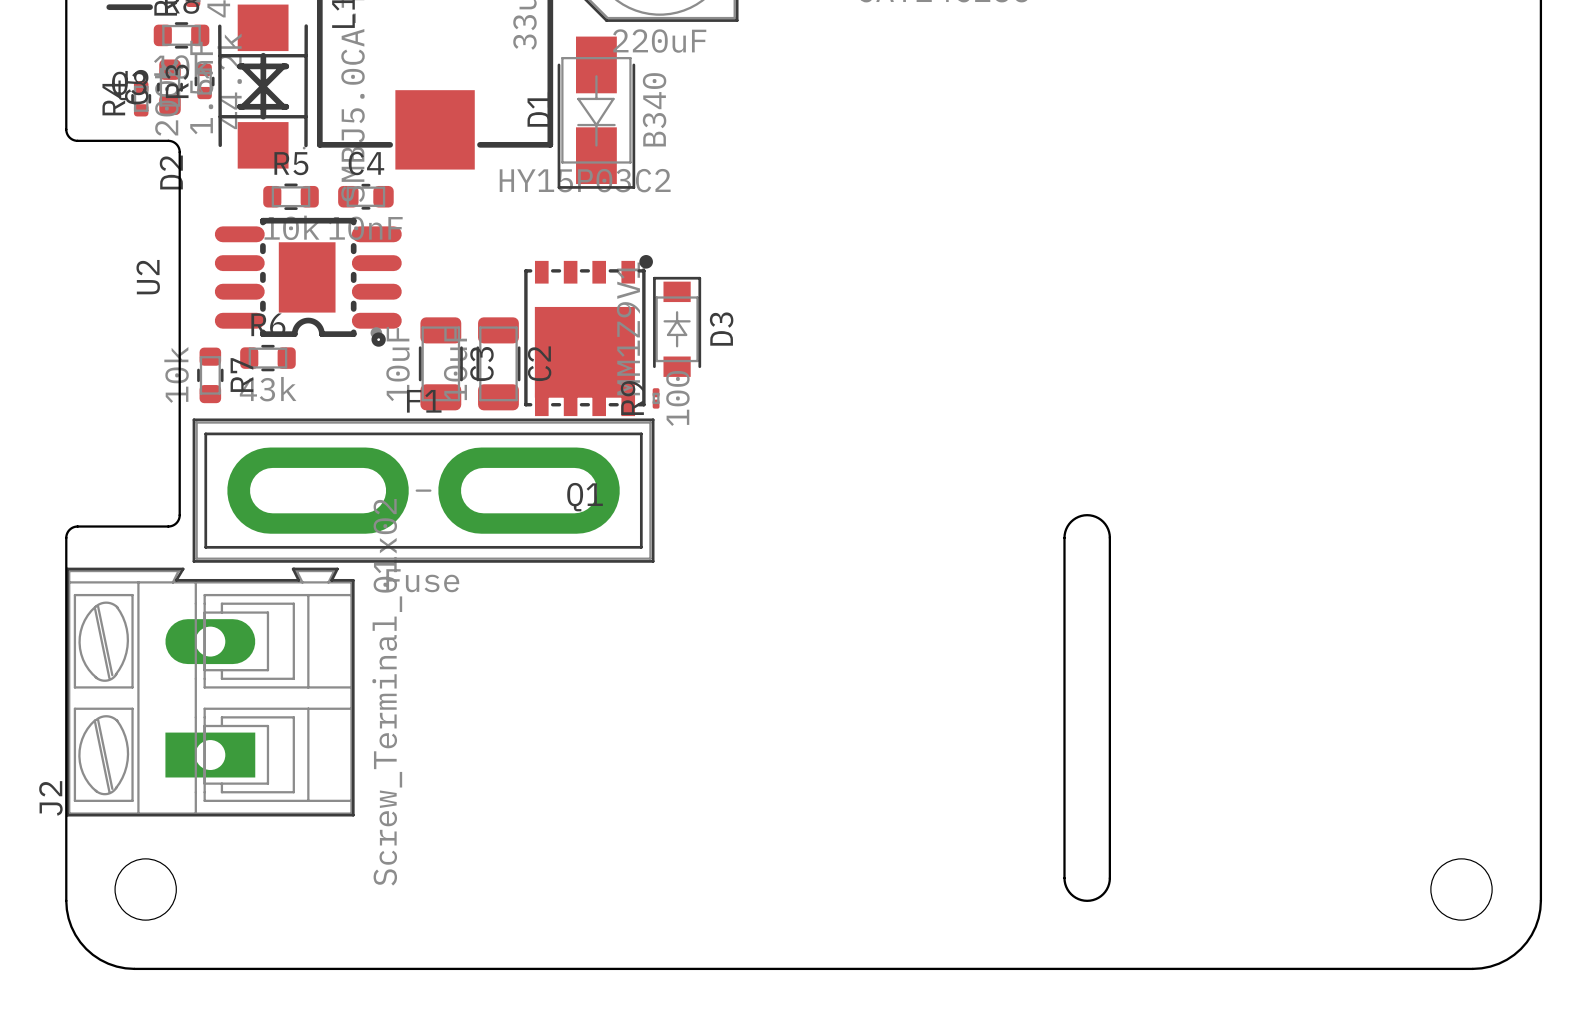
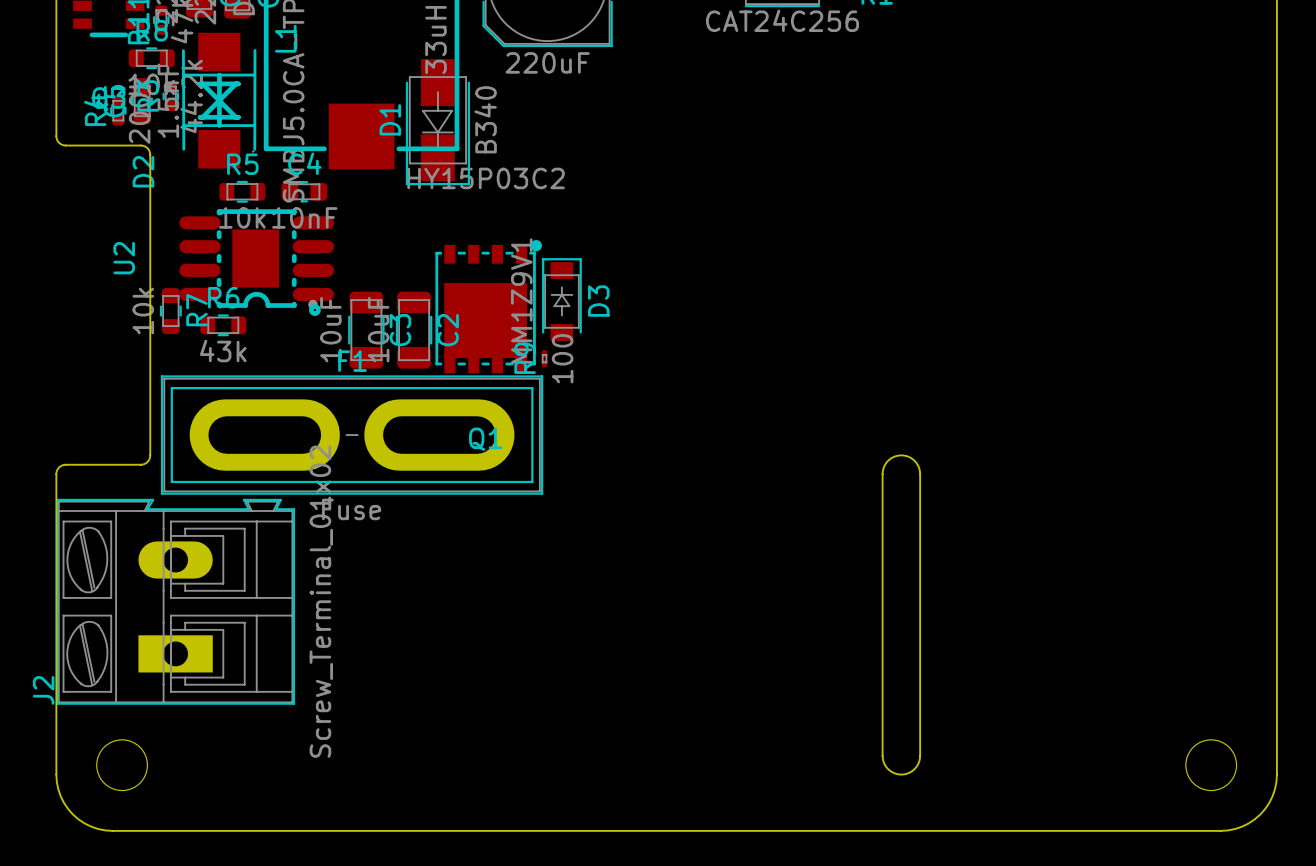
D1 position: (596, 112) -> (437, 122)
R7 position: (210, 375) -> (170, 311)

